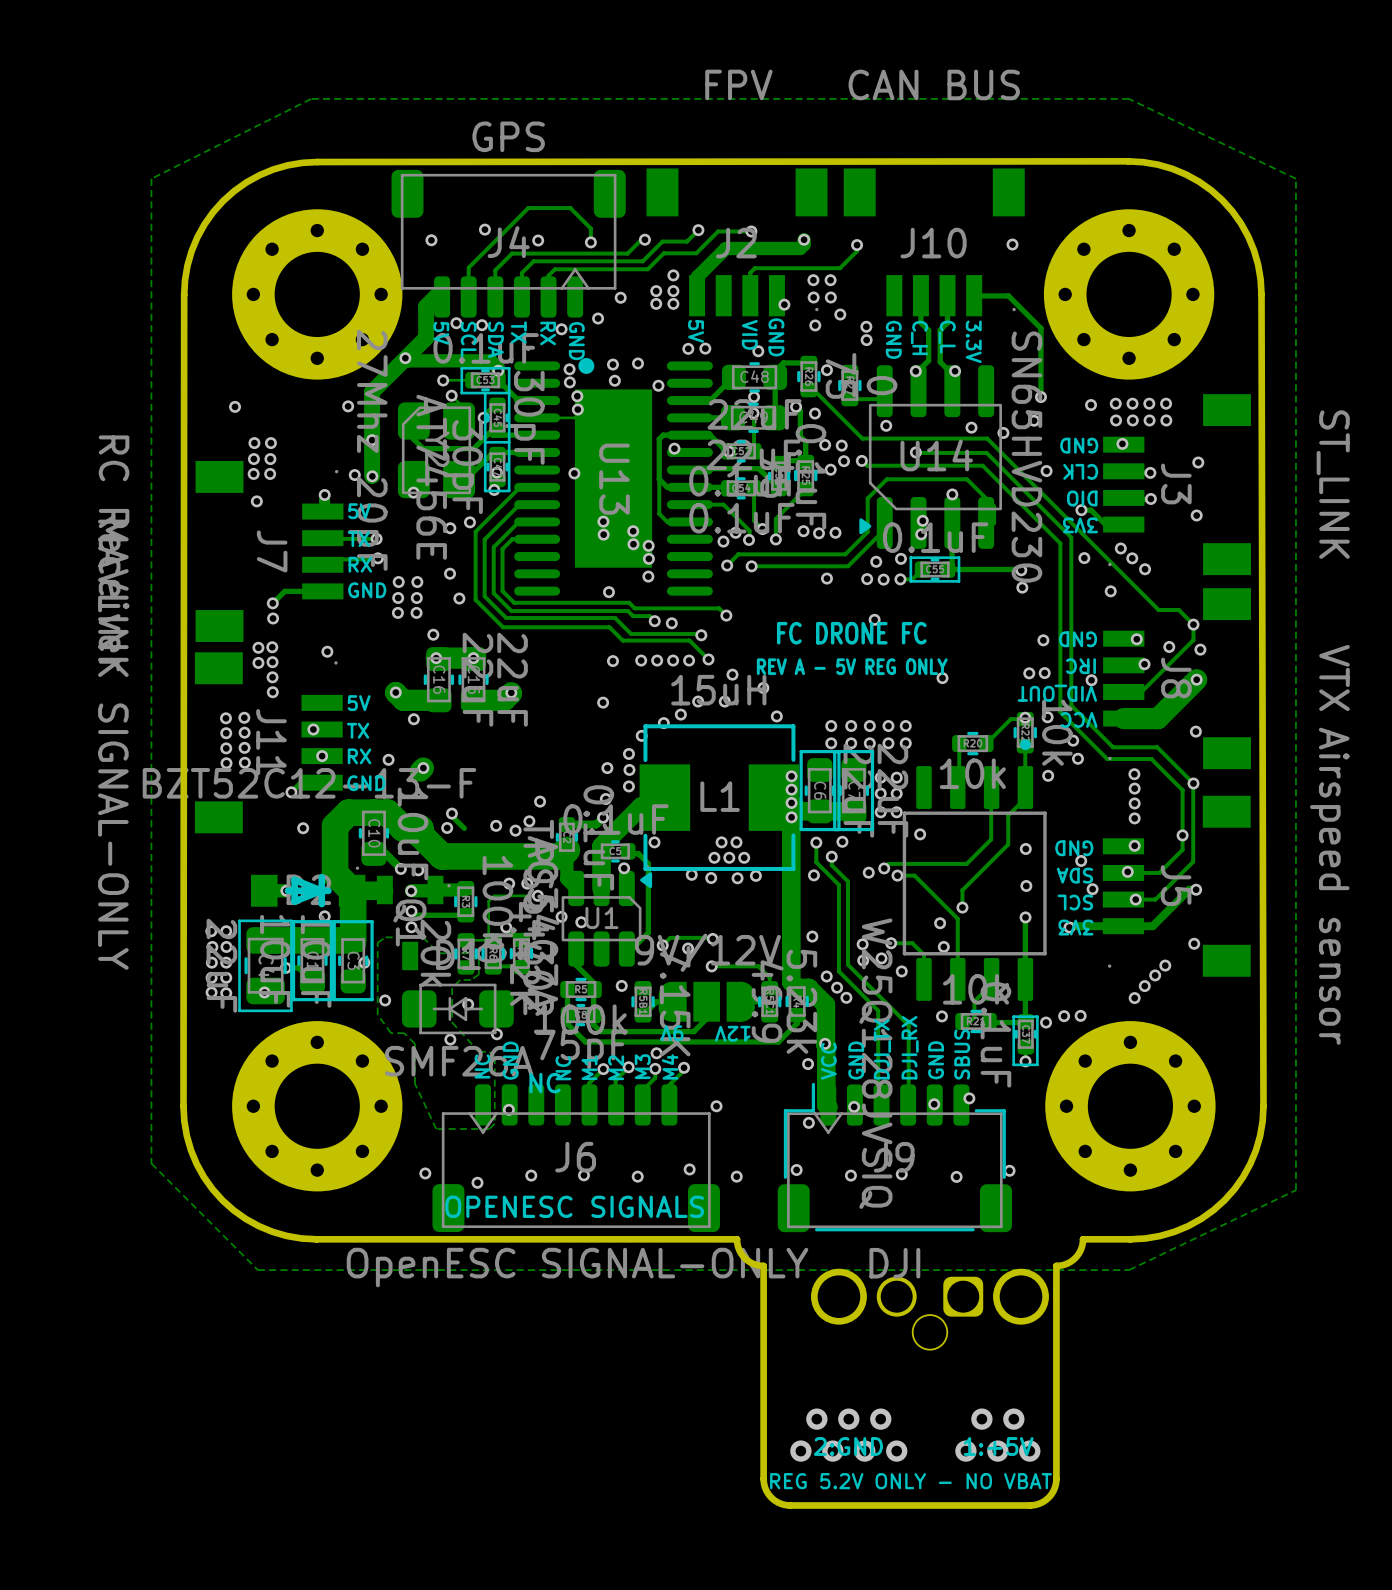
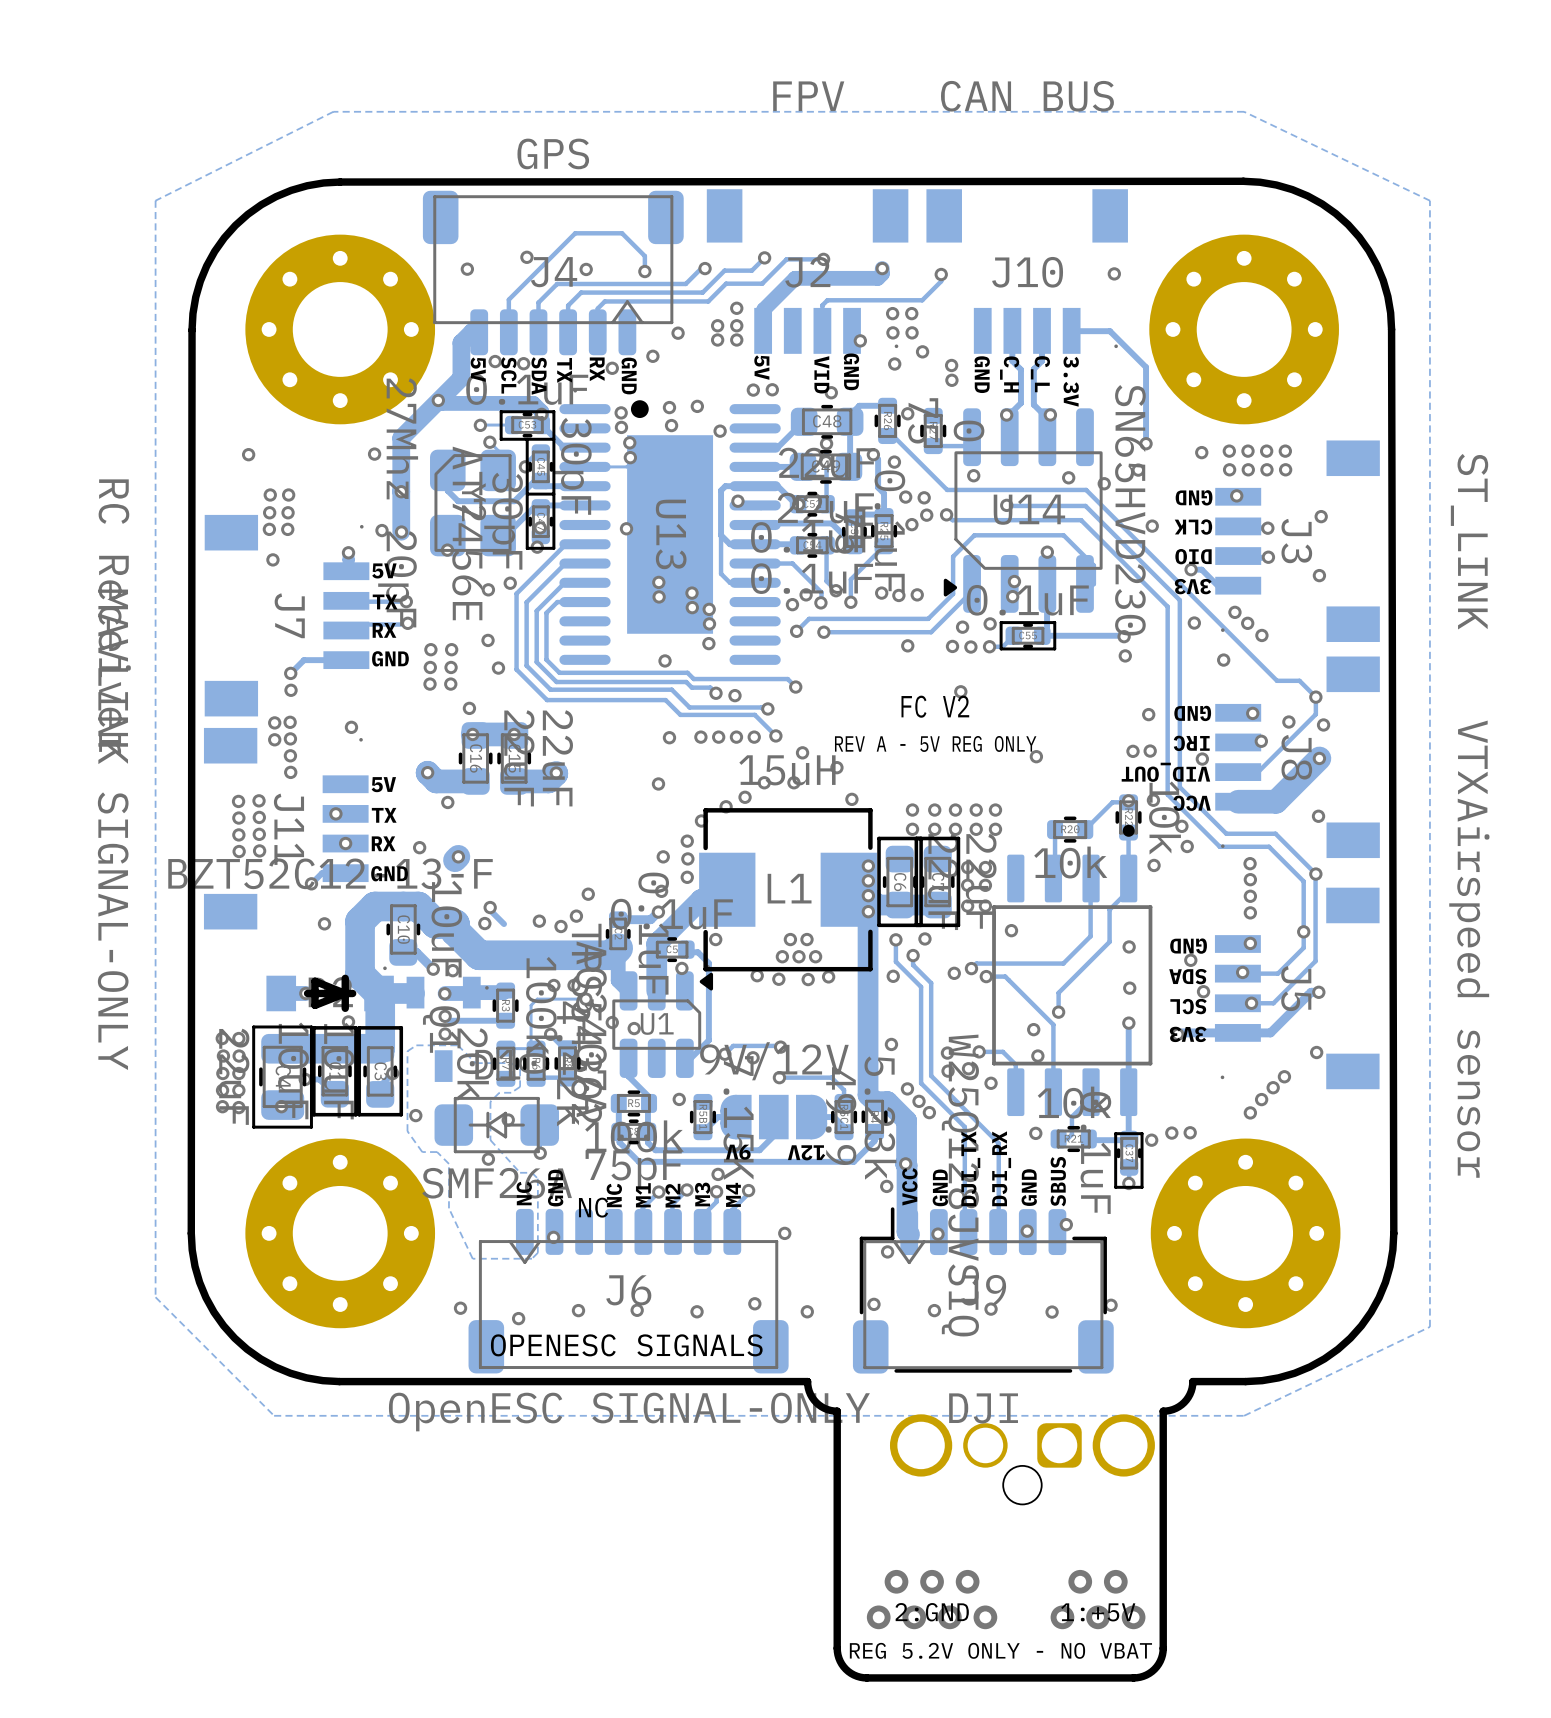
text: FC DRONE FC (851, 633) -> FC V2 (935, 706)

